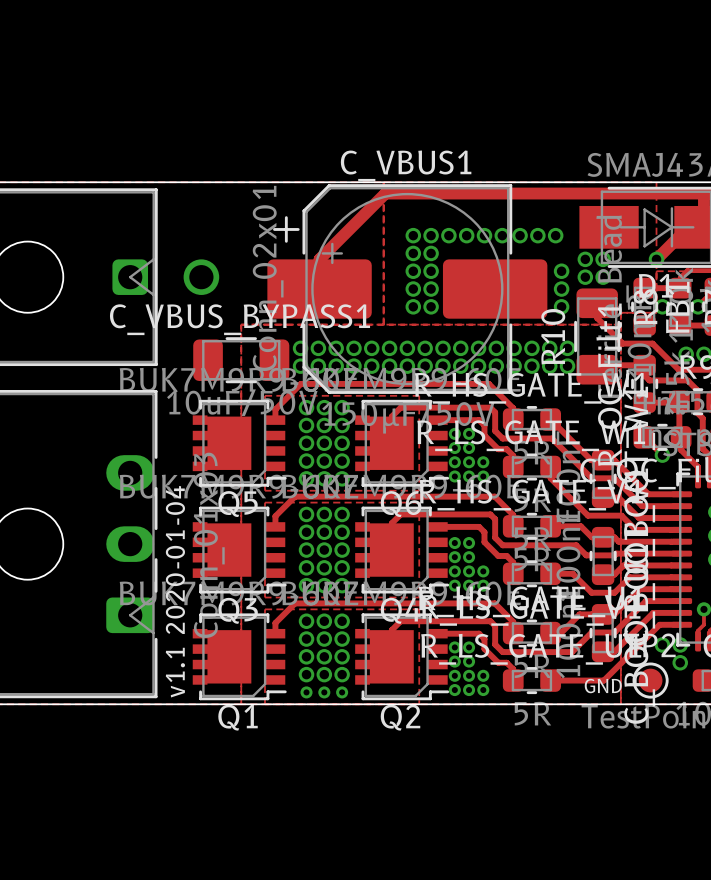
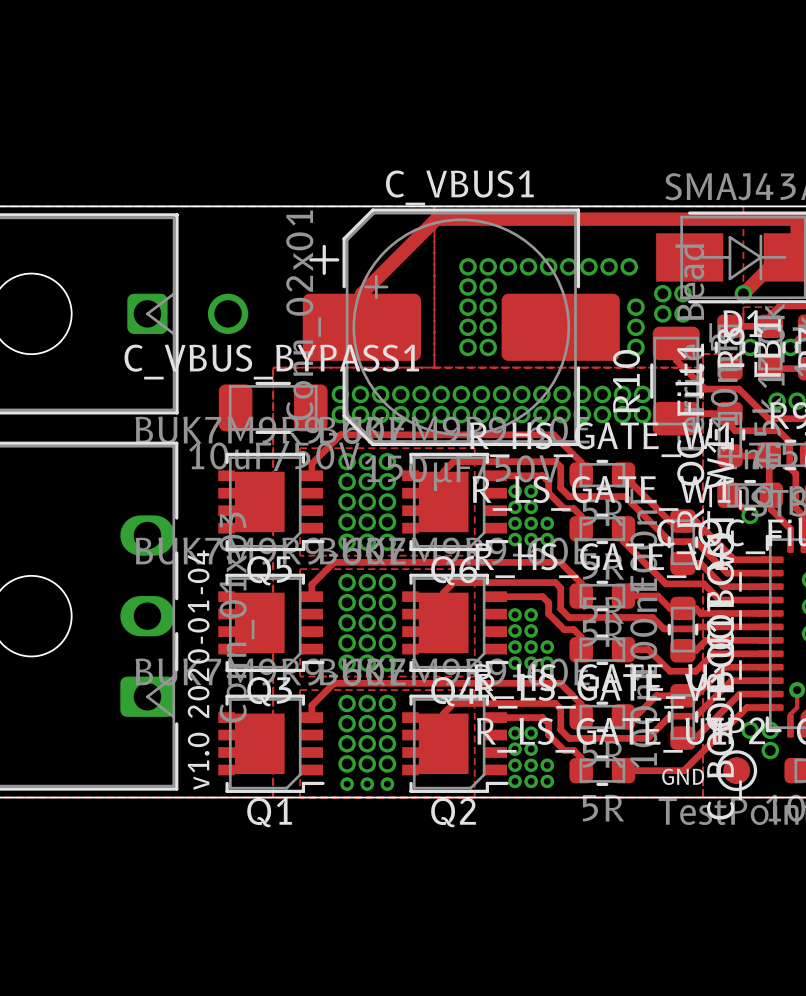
text: v1.1 2020-01-04 (175, 591) -> v1.0 2020-01-04 (198, 670)

